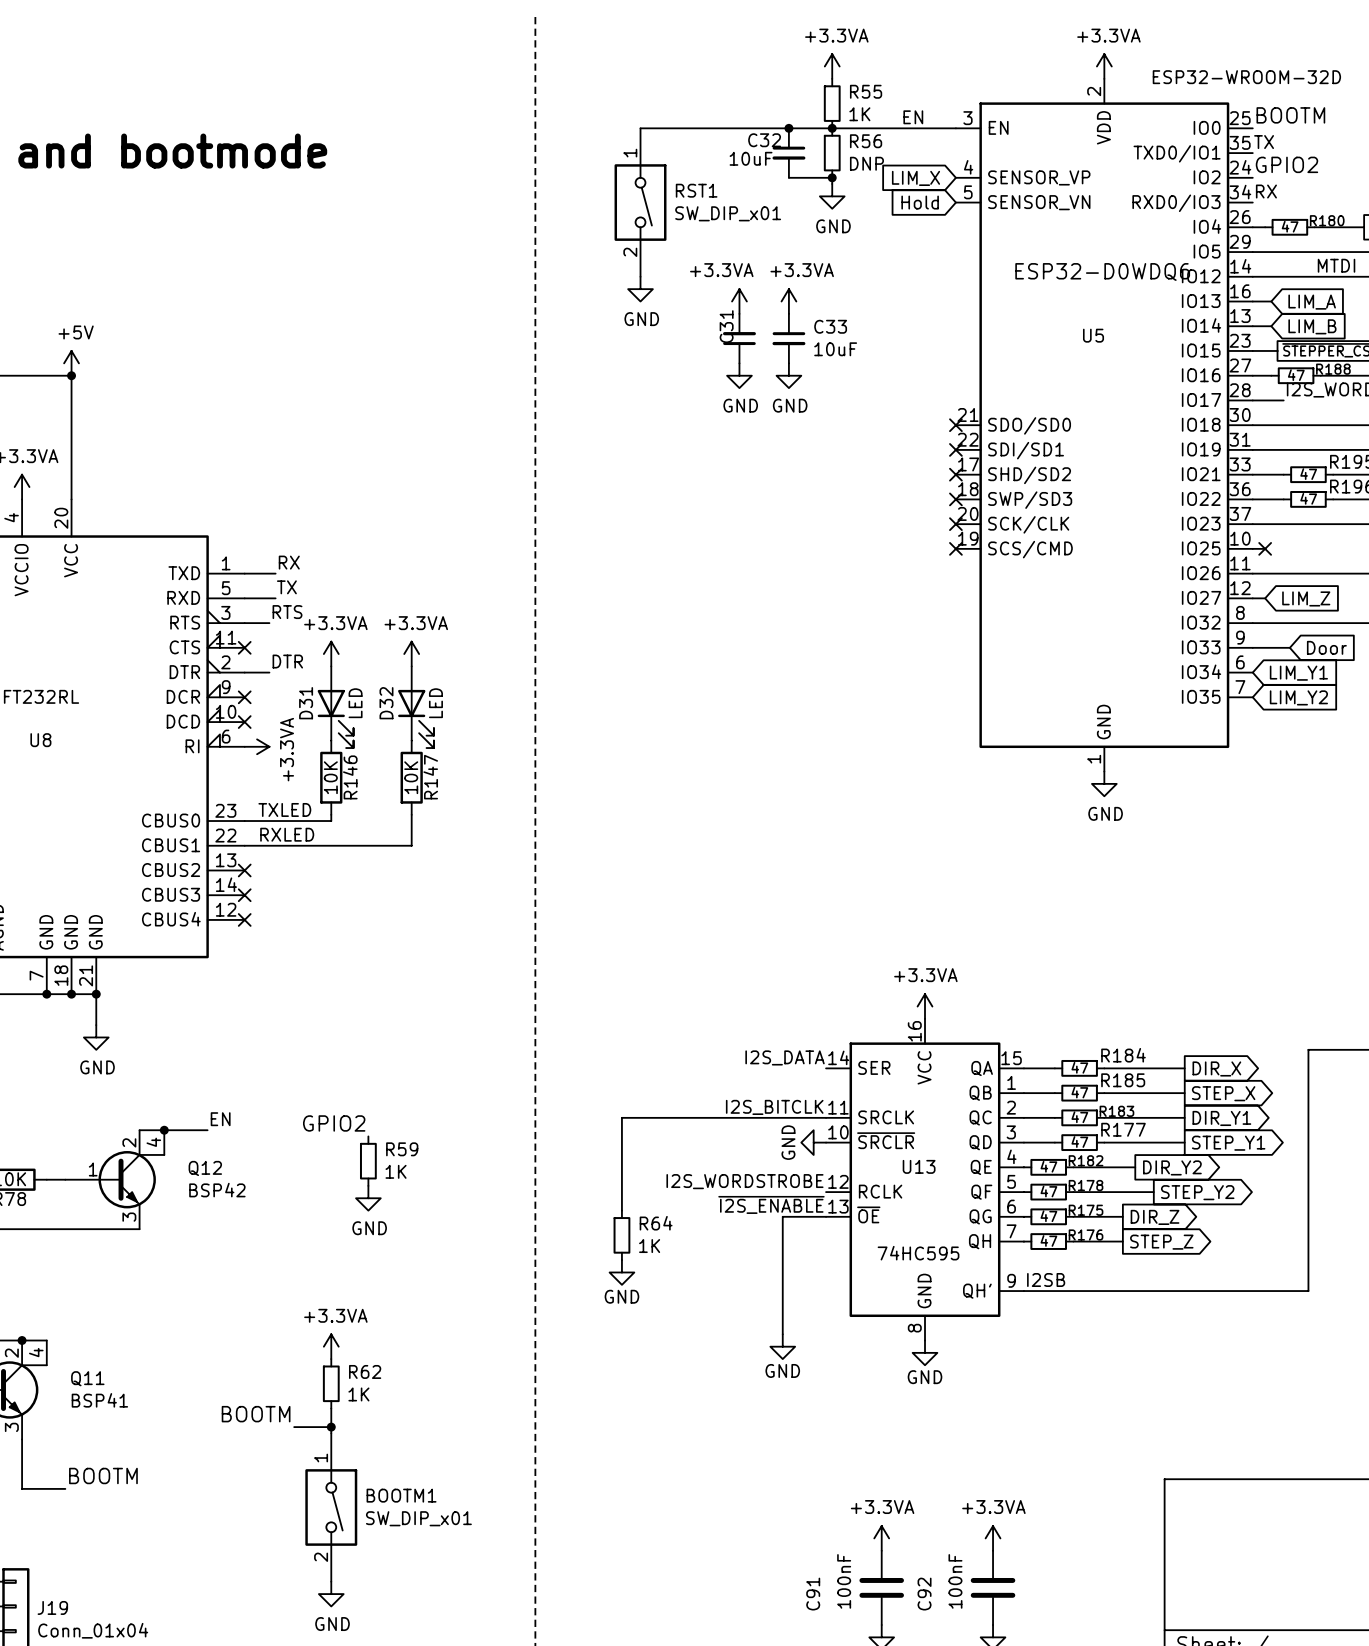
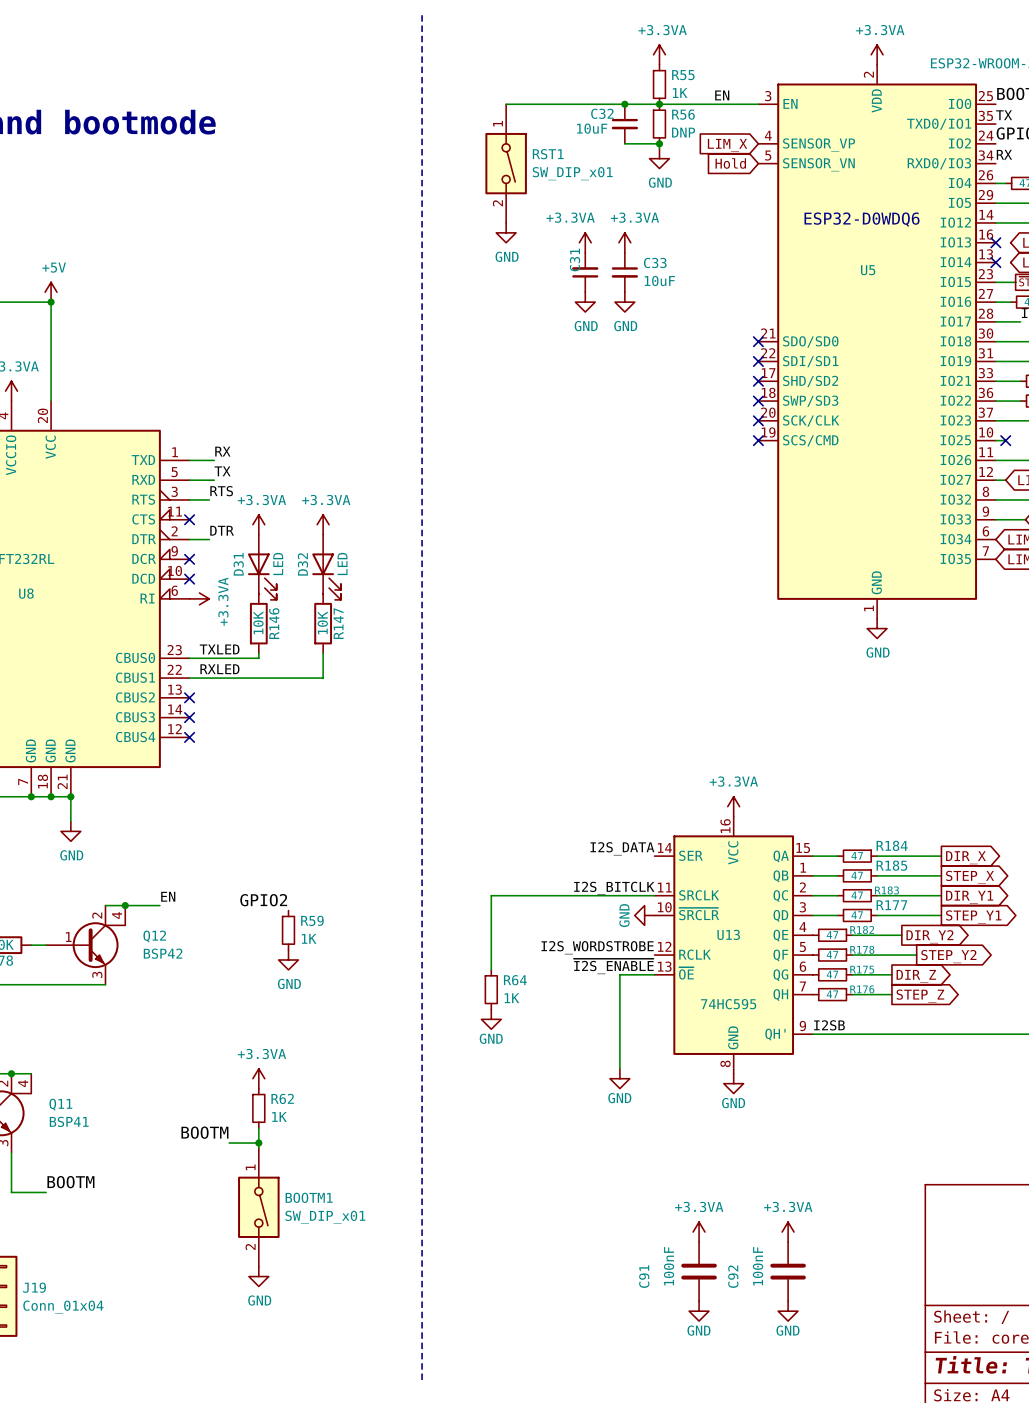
wire: (1252, 301) (1271, 301) -> none
no-connect mark: none -> (995, 242)
wire: (1252, 326) (1271, 326) -> none
no-connect mark: none -> (995, 262)

